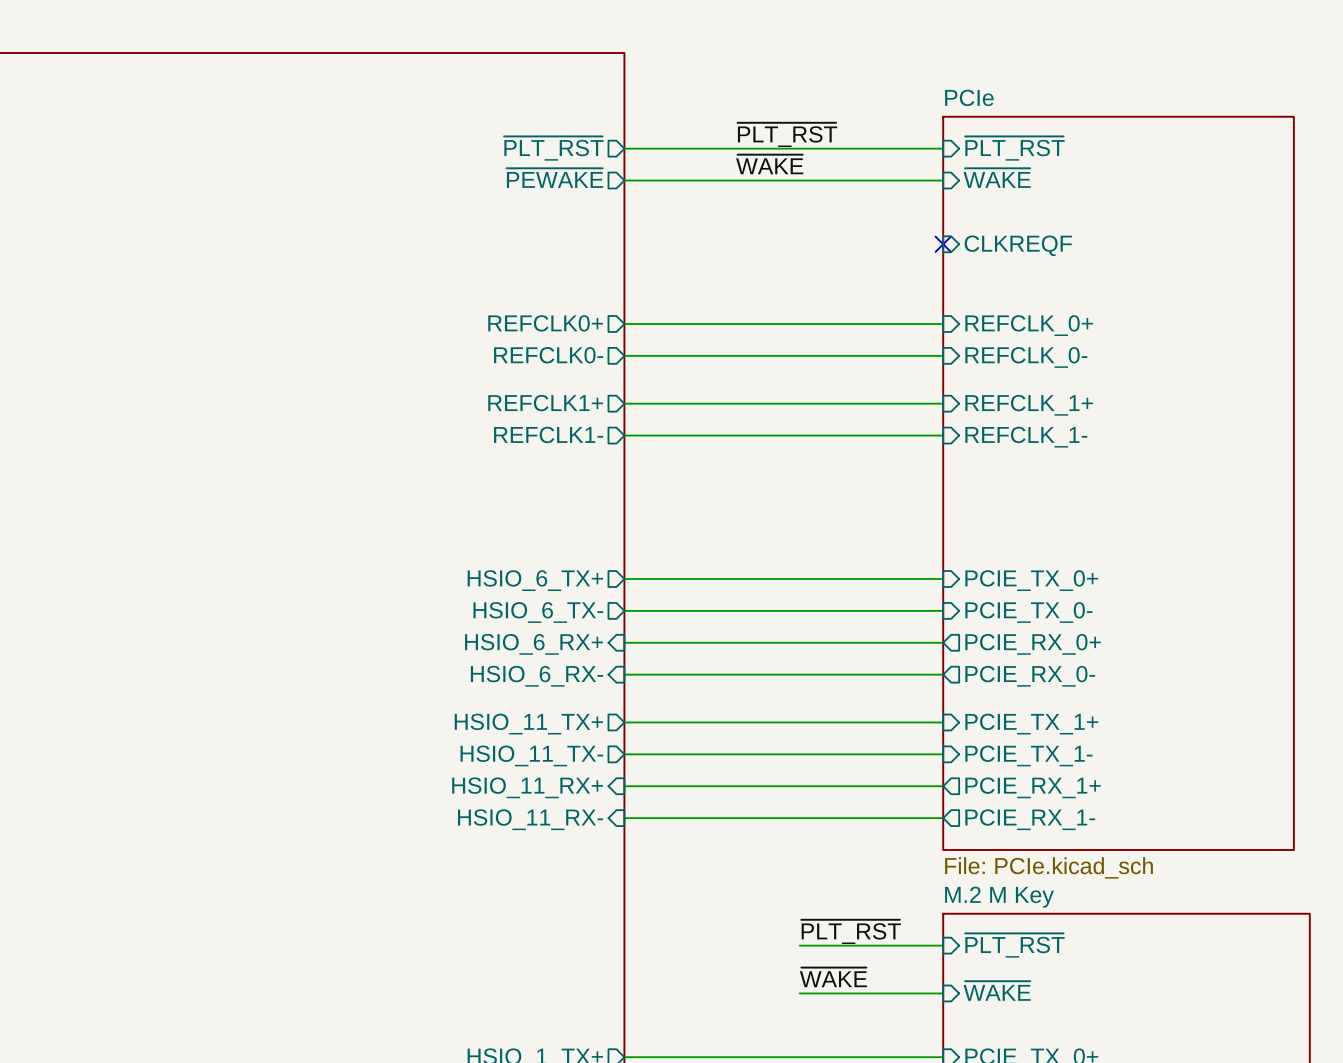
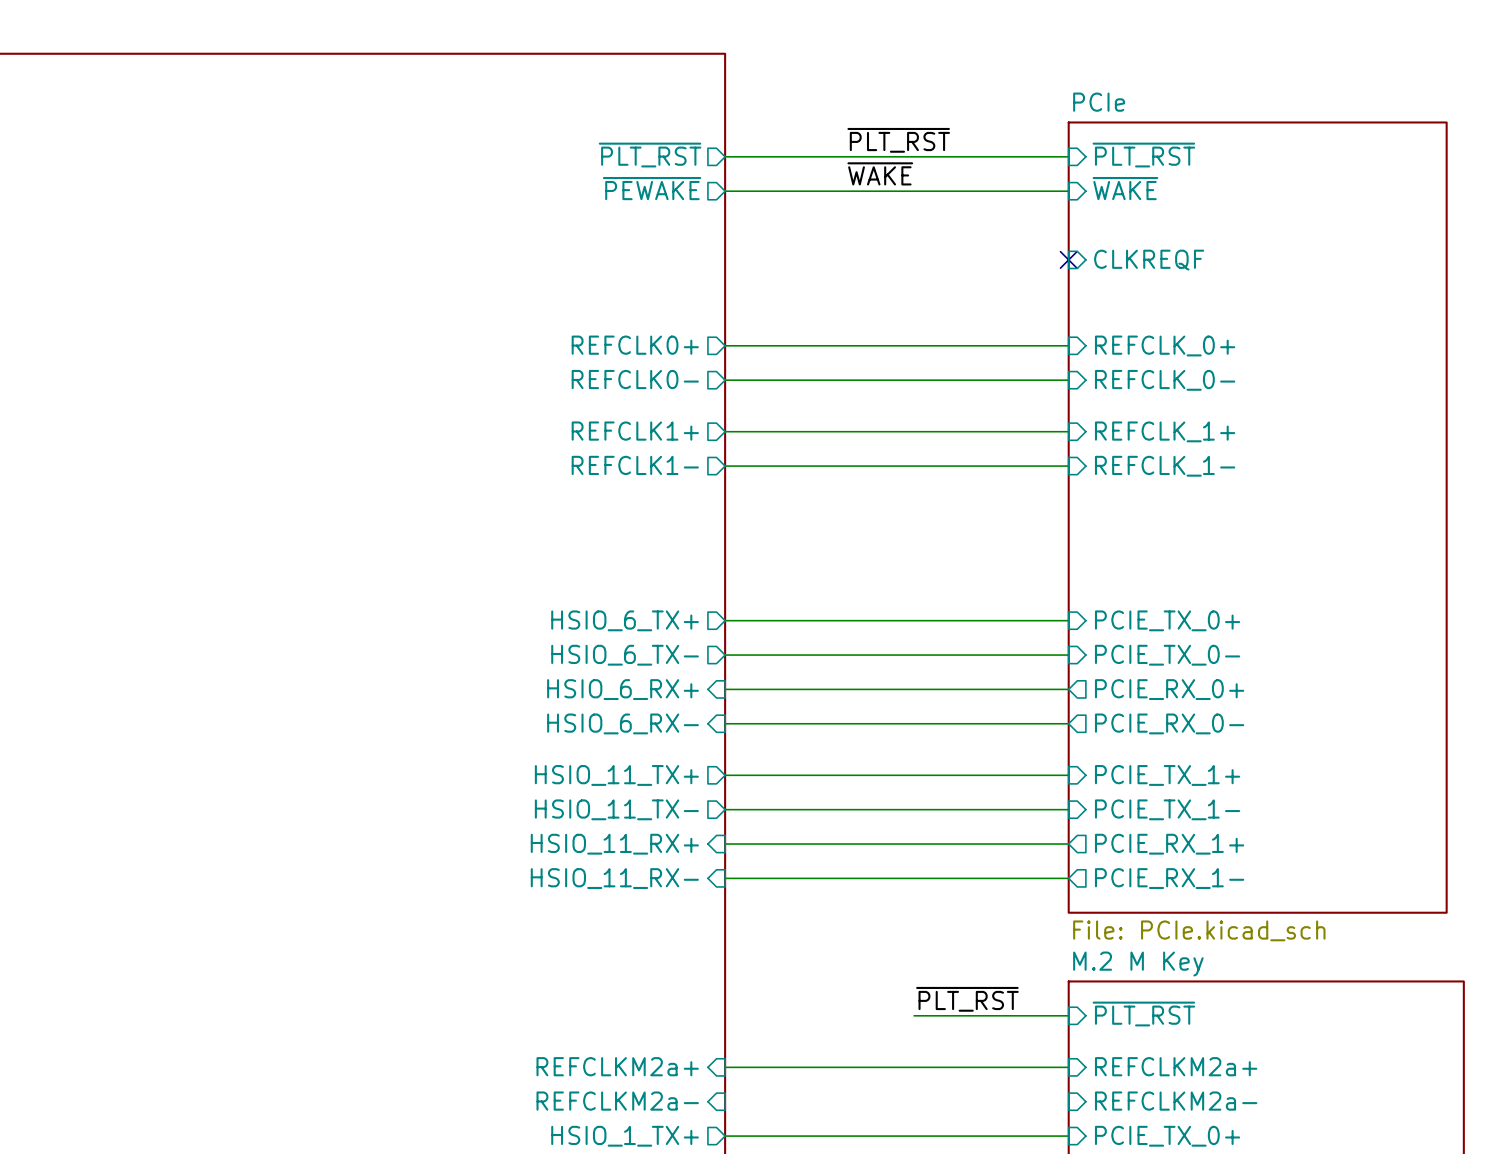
label: ~{WAKE} (833, 977) -> none
sheet pin: ~{WAKE} (997, 991) -> REFCLKM2a+ (1176, 1066)
sheet pin: none -> REFCLKM2a+ (617, 1066)
wire: none -> (725, 1067) (914, 1067)
sheet pin: none -> REFCLKM2a- (617, 1101)
sheet pin: none -> REFCLKM2a- (1176, 1101)

